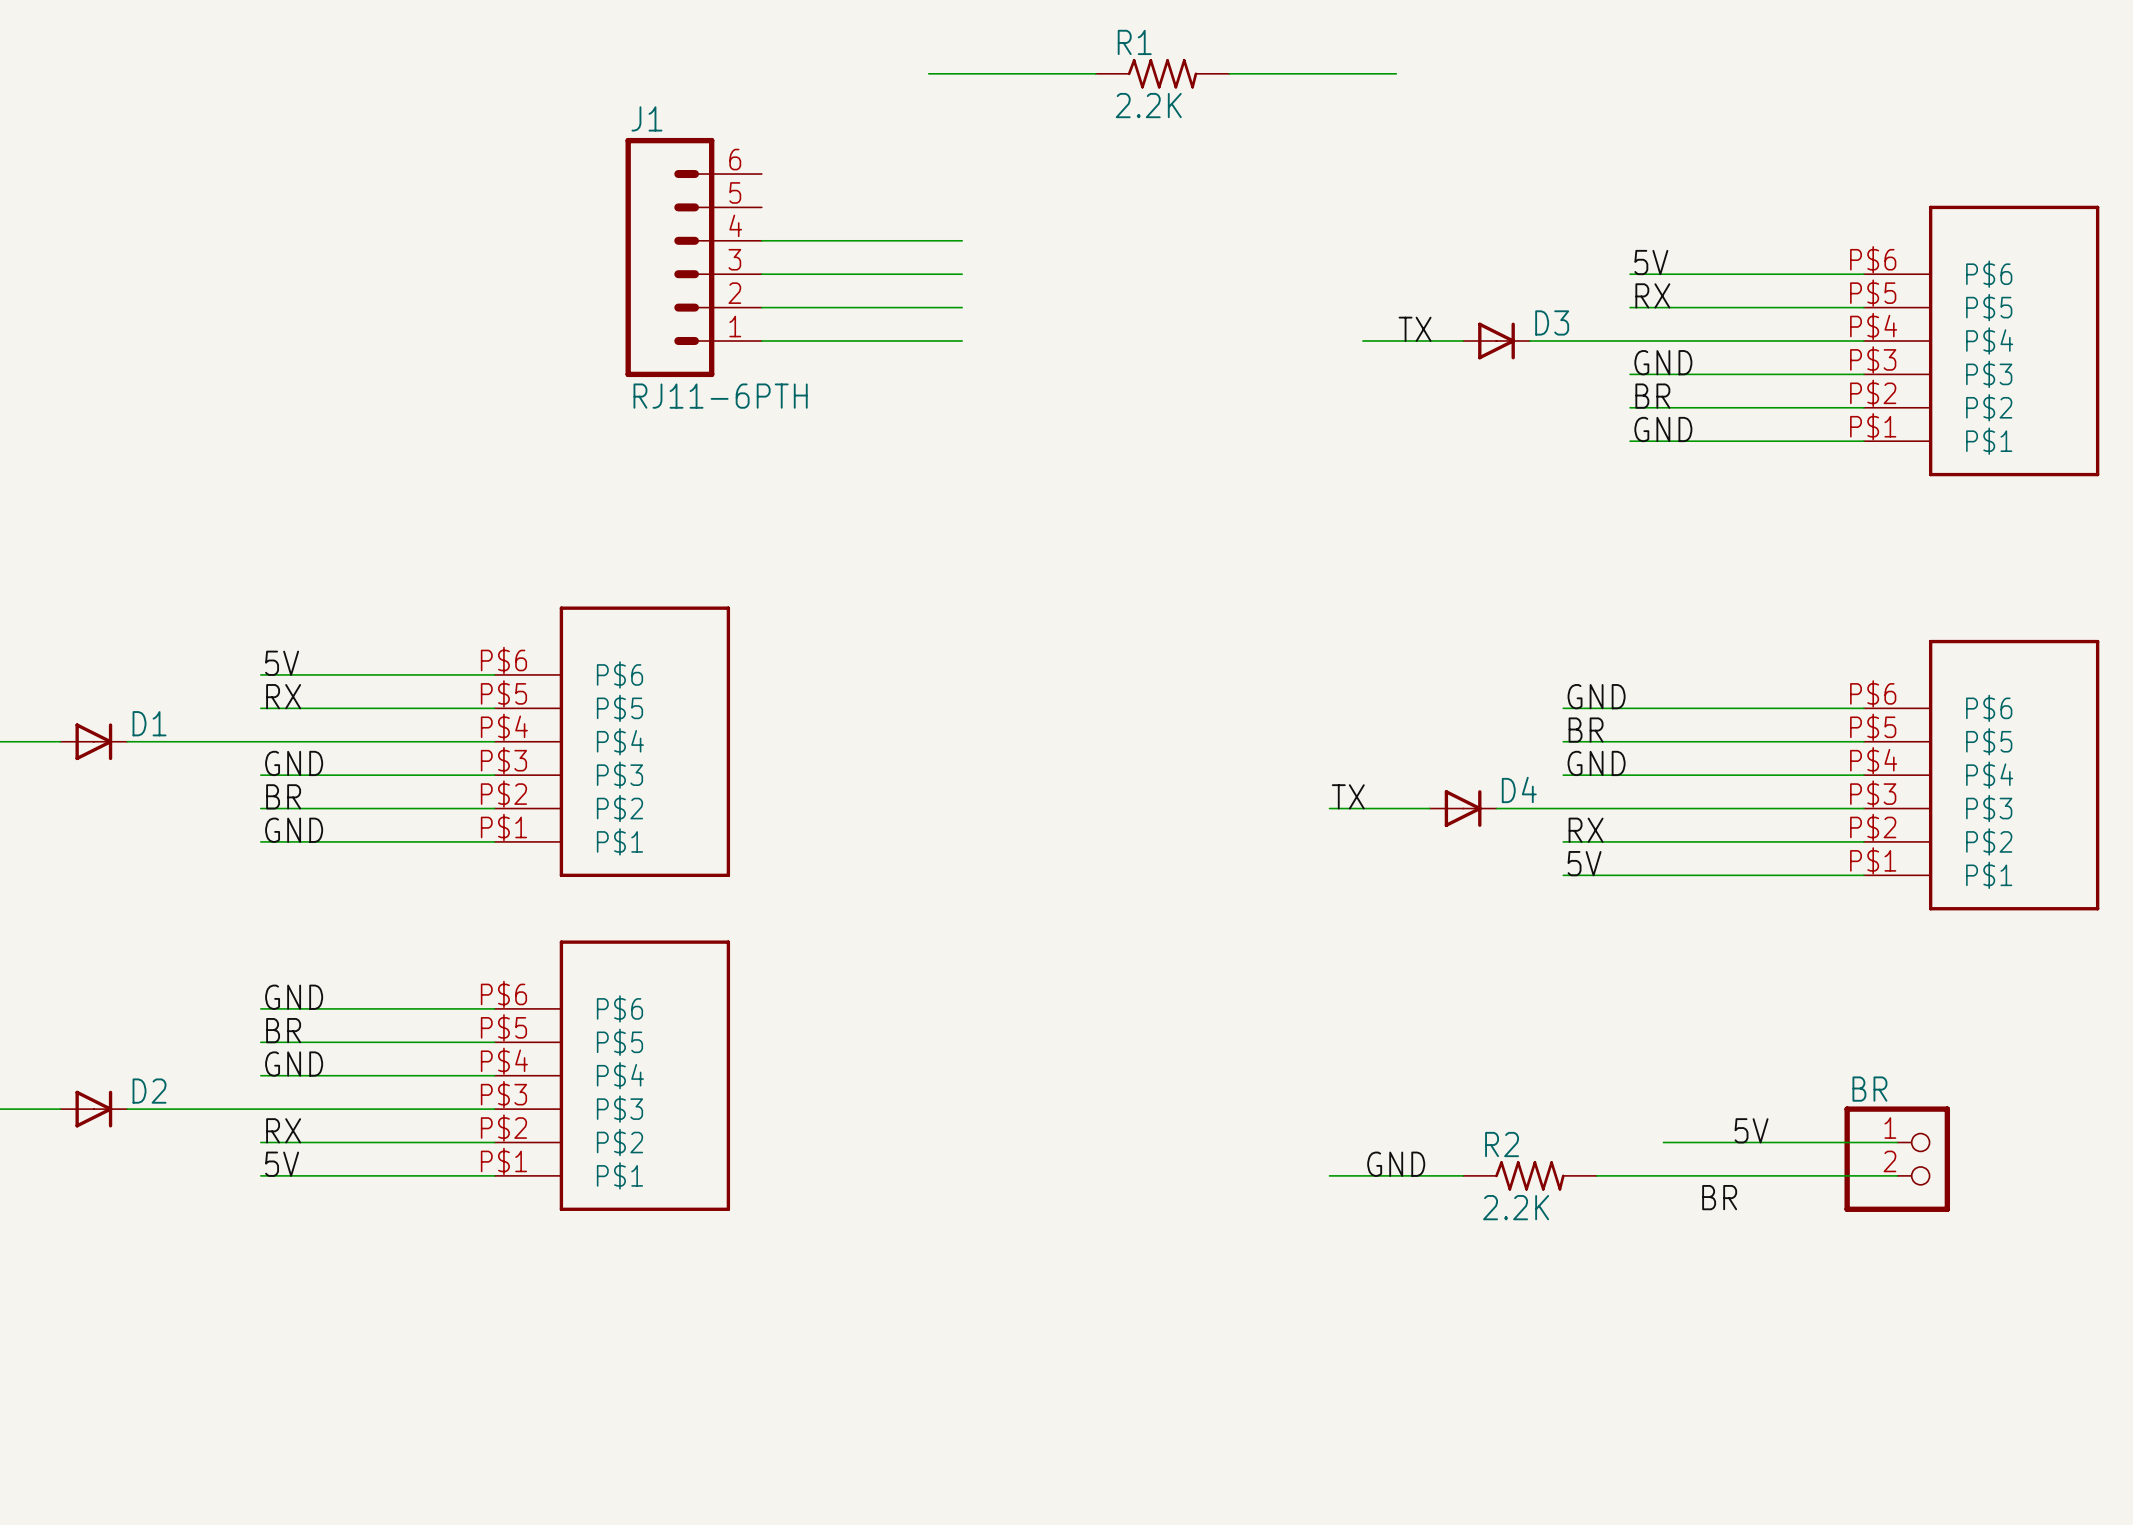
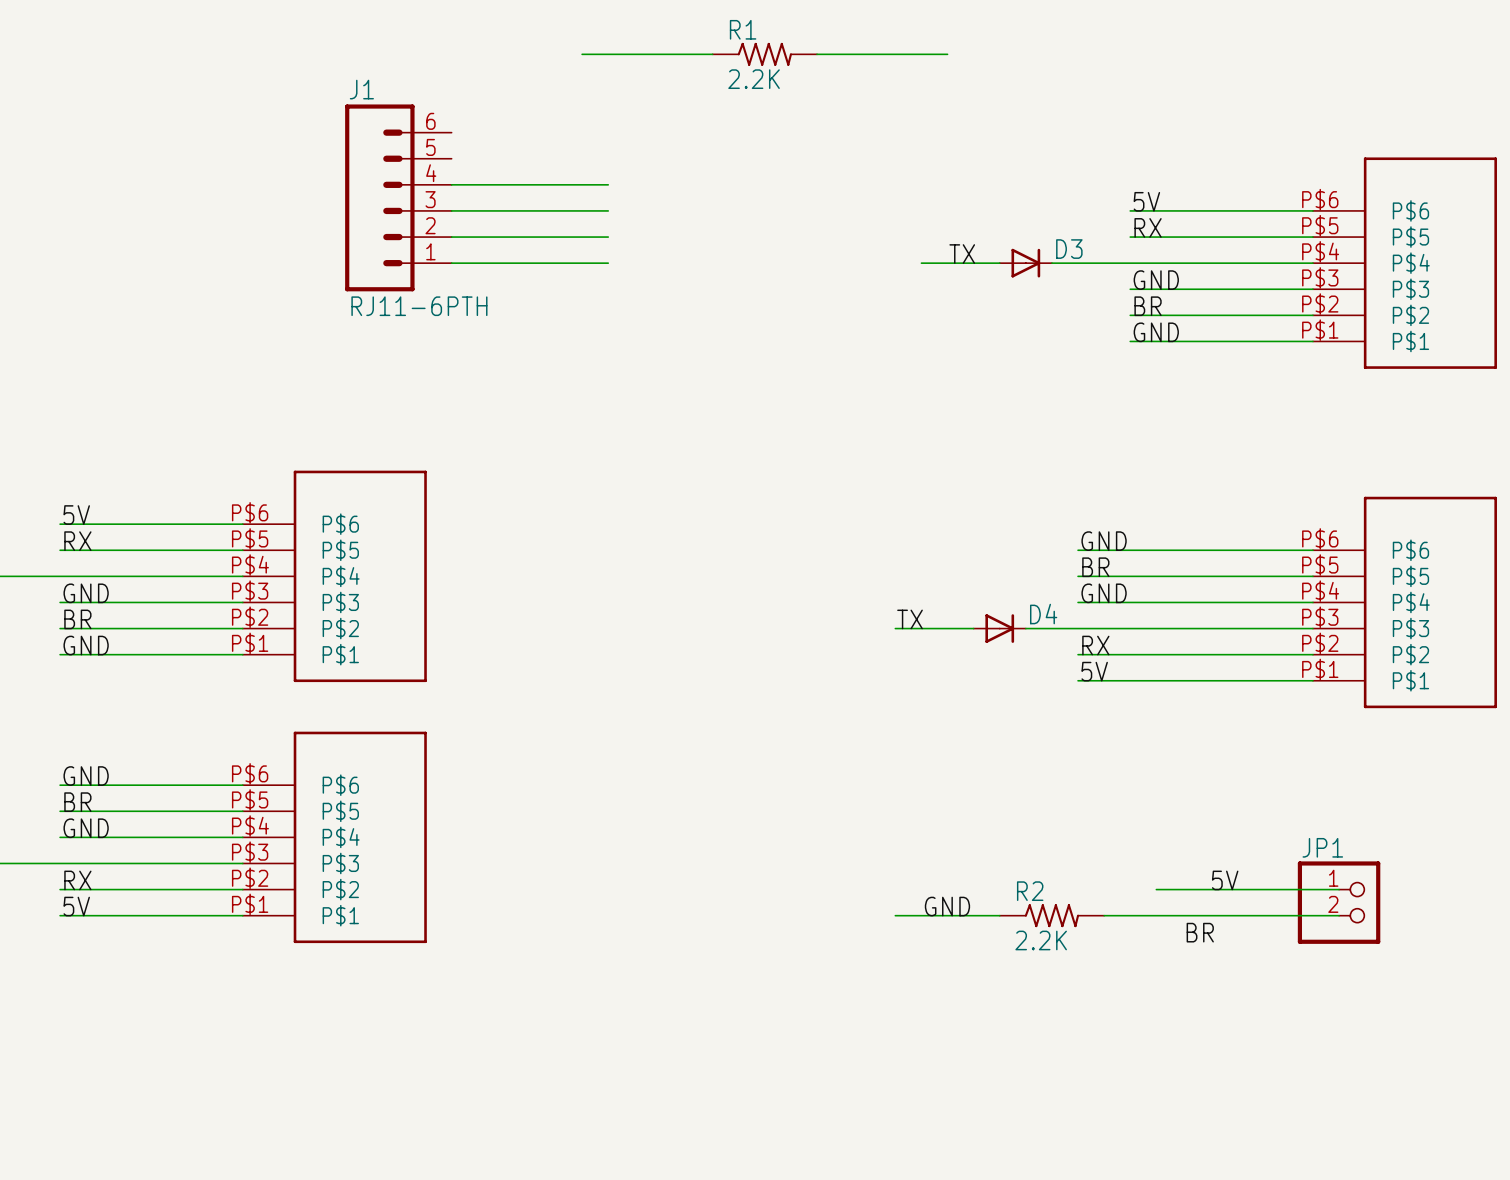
BR name: BR (1869, 1089) -> JP1 (1322, 847)

